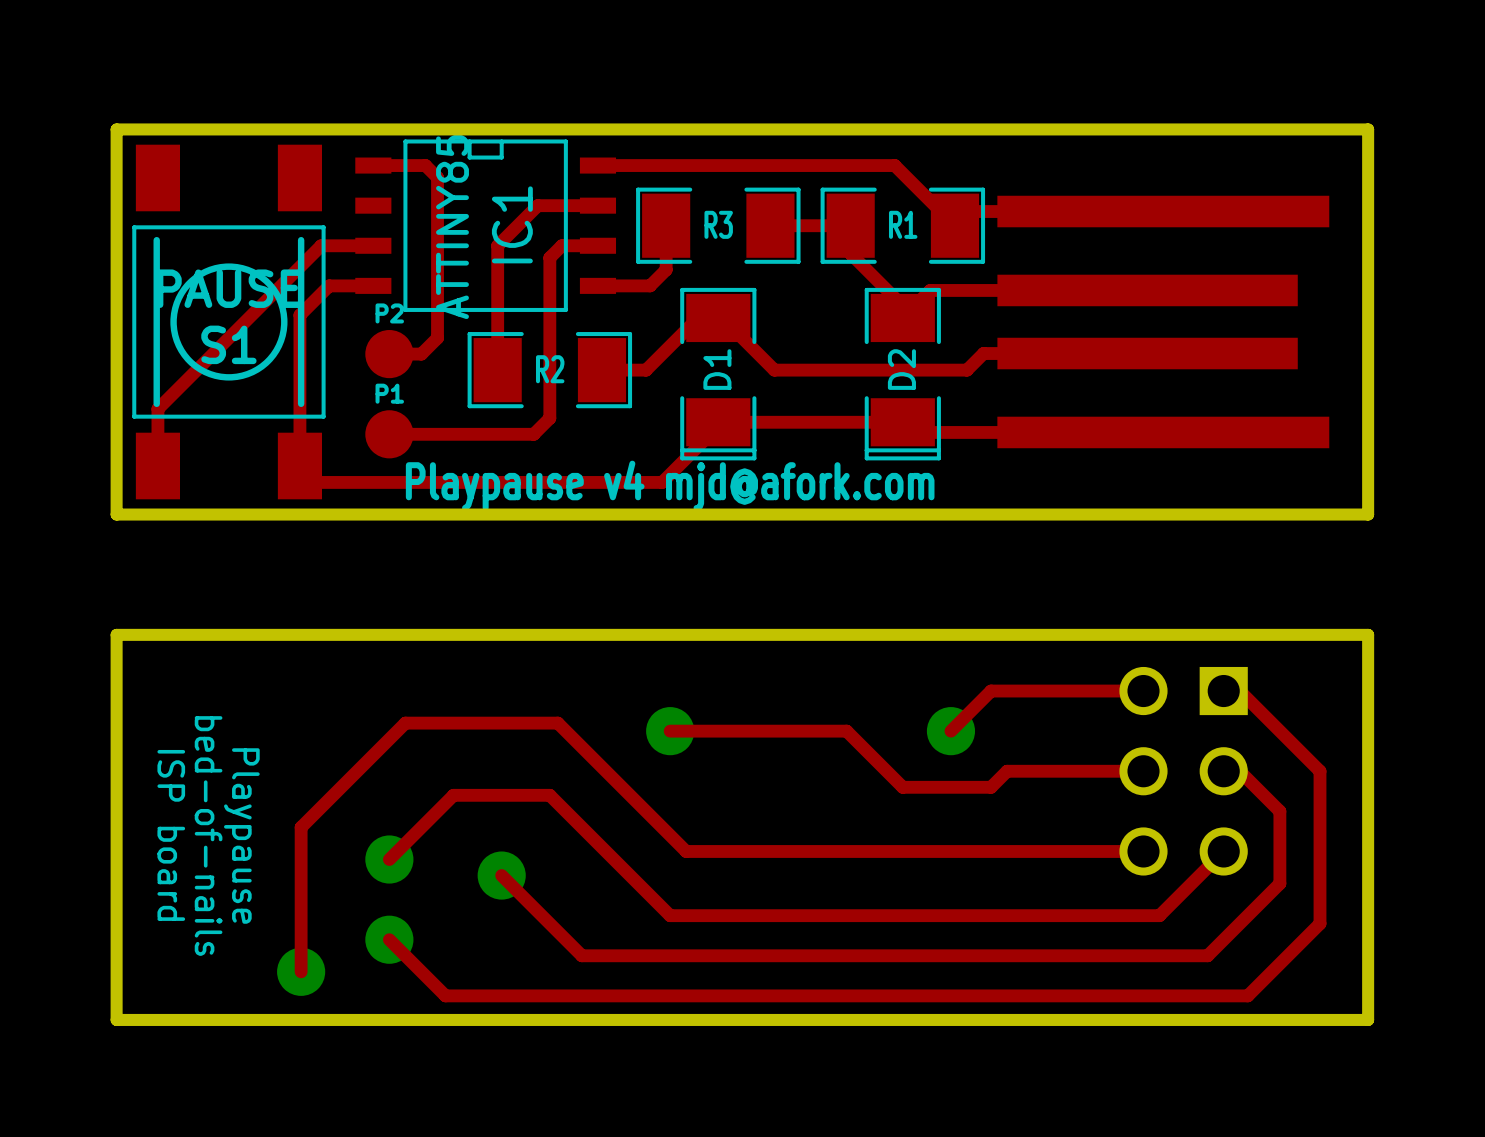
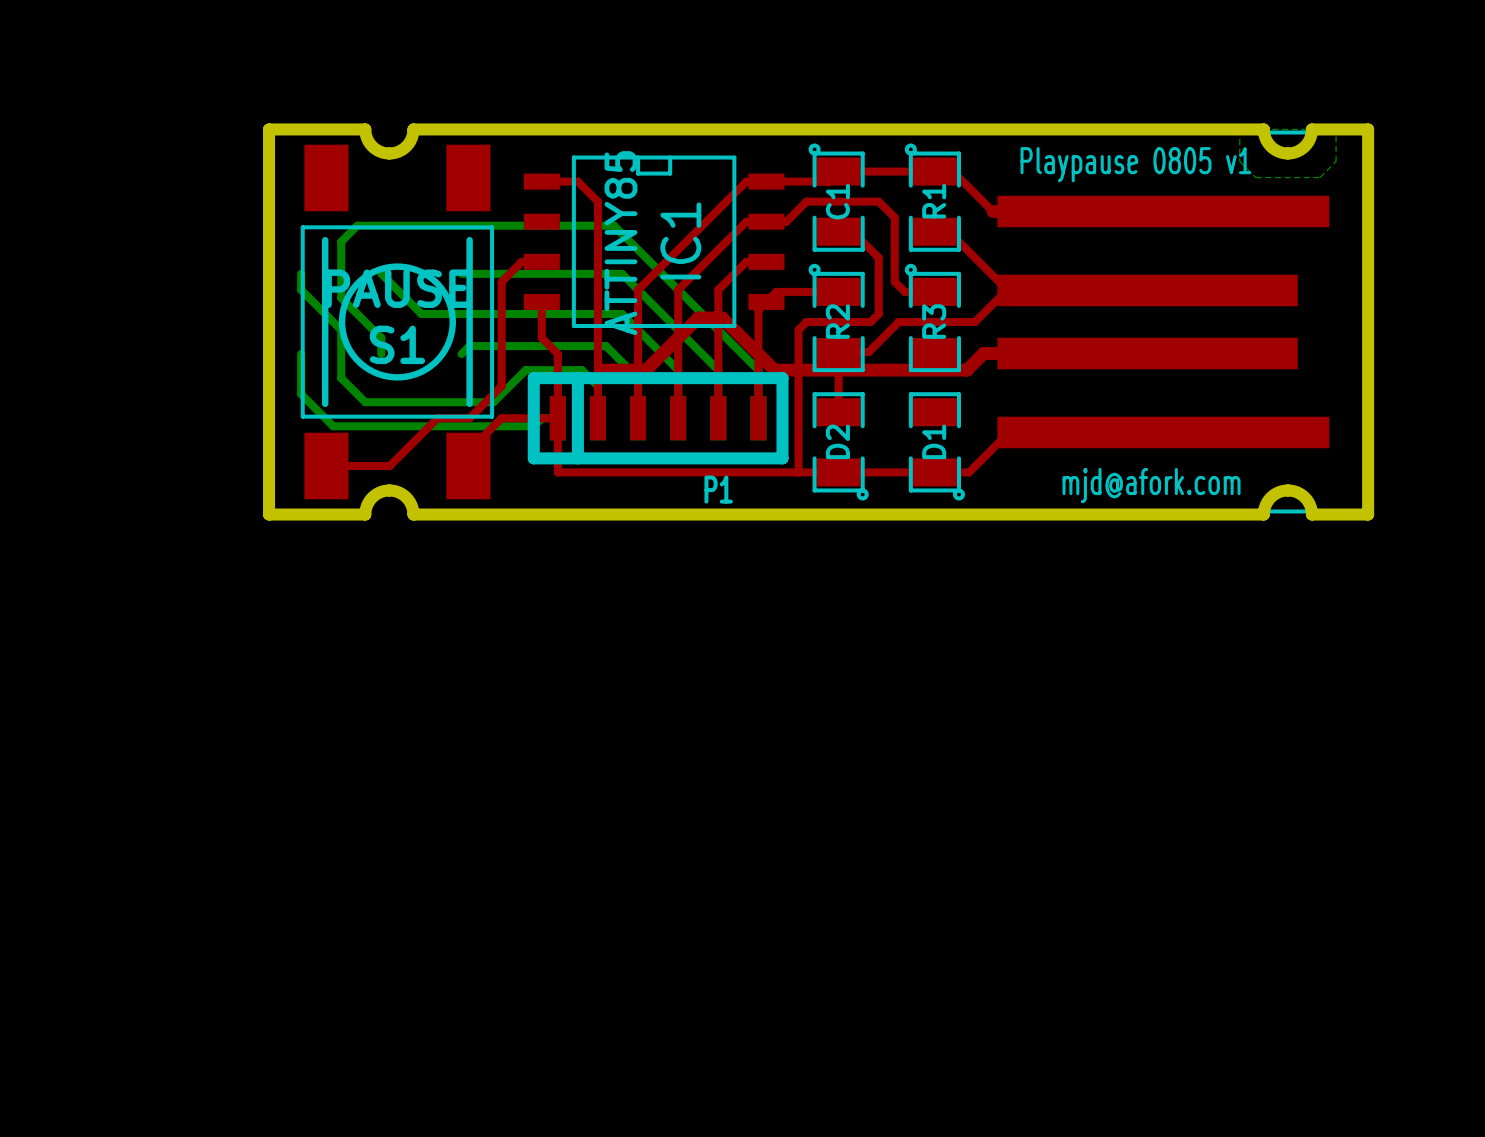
board edge: (269, 129) (116, 129) (116, 514) (269, 514) -> (269, 129) (269, 514)
board edge: (365, 129) (413, 129) -> (365, 129) (367, 138) (372, 146) (380, 151) (389, 153) (398, 151) (406, 146) (411, 138) (413, 129)
bottom zone outline: none -> (1239, 129) (1336, 129) (1336, 161) (1320, 177) (1255, 177) (1239, 161) (1239, 129)
board edge: (1263, 129) (1311, 129) -> (1263, 129) (1265, 138) (1270, 146) (1278, 151) (1287, 153) (1297, 151) (1304, 146) (1310, 138) (1311, 129)
text: none -> Playpause 0805 v1 (1135, 164)
top track: (373, 165) (425, 165) (437, 177) (437, 338) (421, 354) (389, 354) -> none
top track: (597, 165) (894, 165) (954, 225) (969, 211) (992, 211) -> (638, 418) (638, 289) (746, 181) (828, 181) (838, 171) (952, 171) (992, 211)
top track: none -> (541, 181) (577, 181) (597, 201) (597, 418)
R3 footprint: [636, 187, 801, 264] -> [904, 263, 961, 373]
R1 footprint: [820, 187, 986, 264] -> [904, 143, 961, 252]
C1: none -> (836, 197)
top track: (597, 205) (537, 205) (497, 245) (497, 370) -> none
IC1 position: (485, 225) -> (654, 241)
top track: (666, 225) (666, 269) (650, 285) (597, 285) -> none
top track: (770, 225) (850, 225) (850, 253) (902, 305) (902, 317) (930, 290) (1006, 290) -> (934, 231) (948, 231) (1007, 290)
top track: none -> (838, 231) (852, 231) (878, 257) (878, 313) (870, 321) (806, 321) (798, 330) (798, 472)
top track: (373, 245) (321, 245) (157, 409) (157, 465) -> none
top track: (597, 245) (561, 245) (549, 257) (549, 418) (533, 434) (389, 434) -> none
top track: none -> (541, 261) (521, 261) (501, 281) (501, 386) (469, 418) (437, 418) (389, 465) (326, 465)
top track: none -> (766, 261) (746, 261) (718, 289) (718, 418)
bottom track: none -> (301, 273) (301, 289) (341, 330) (341, 378) (365, 402) (493, 402) (525, 370) (581, 370) (597, 386) (597, 418)
bottom track: none -> (381, 273) (421, 313) (622, 313) (678, 370) (678, 418)
bottom track: none -> (461, 273) (622, 273) (718, 370) (718, 418)
top track: (373, 285) (329, 285) (299, 315) (299, 473) (309, 482) (662, 482) (718, 426) (718, 422) (902, 422) (913, 432) (1008, 432) -> (541, 301) (541, 338) (557, 354) (557, 472) (969, 472) (1008, 432)
D1 footprint: [680, 287, 757, 461] -> [908, 392, 966, 501]
D2 footprint: [864, 287, 941, 461] -> [812, 392, 869, 501]
top track: none -> (1006, 290) (975, 321) (898, 321) (868, 352) (838, 352) (838, 412)
top track: none -> (838, 291) (776, 291) (758, 309) (758, 418)
top track: none -> (934, 291) (904, 291) (894, 281) (894, 217) (878, 201) (806, 201) (786, 221) (746, 221) (678, 289) (678, 418)
S1 position: (228, 321) -> (397, 321)
R2 footprint: [467, 332, 633, 409] -> [808, 263, 865, 373]
bottom track: none -> (301, 354) (301, 394) (333, 426) (533, 426) (541, 418) (557, 418)
bottom track: none -> (381, 354) (381, 338) (341, 297) (341, 241) (357, 225) (614, 225) (758, 370) (758, 418)
P2: (389, 354) -> none
bottom track: none -> (461, 354) (469, 346) (605, 346) (638, 378) (638, 418)
P1 name position: P1 (389, 393) -> P1 (718, 489)
P1 footprint: [365, 410, 414, 459] -> [527, 372, 789, 465]
top track: none -> (557, 418) (501, 418) (468, 451) (468, 465)
text: Playpause v4 mjd@afork.com (670, 485) -> none
text: none -> mjd@afork.com (1151, 485)
board edge: (365, 514) (413, 514) -> (365, 514) (367, 505) (372, 497) (380, 492) (389, 490) (398, 492) (406, 497) (411, 505) (413, 514)
board edge: (1263, 514) (1311, 514) -> (1263, 514) (1265, 505) (1270, 497) (1278, 492) (1287, 490) (1297, 492) (1304, 497) (1310, 505) (1311, 514)
board edge: (116, 634) (116, 1019) (1368, 1019) (1368, 634) (116, 634) -> none
top track: (1143, 691) (991, 691) (950, 731) -> none
top track: (1223, 691) (1239, 691) (1320, 771) (1320, 923) (1247, 995) (445, 995) (389, 939) -> none
top track: (670, 731) (846, 731) (902, 787) (991, 787) (1007, 771) (1143, 771) -> none
part: (670, 731) -> none
part: (950, 731) -> none
part: (1183, 771) -> none
top track: (1223, 771) (1239, 771) (1279, 811) (1279, 883) (1207, 955) (581, 955) (501, 875) -> none
text: ISP board (171, 835) -> none
text: bed-of-nails (208, 836) -> none
text: Playpause (241, 836) -> none
top track: (1143, 851) (686, 851) (557, 723) (405, 723) (301, 827) (301, 971) -> none
top track: (1223, 851) (1159, 915) (670, 915) (549, 795) (453, 795) (389, 859) -> none
part: (389, 859) -> none
part: (501, 875) -> none
part: (389, 939) -> none
part: (301, 971) -> none

